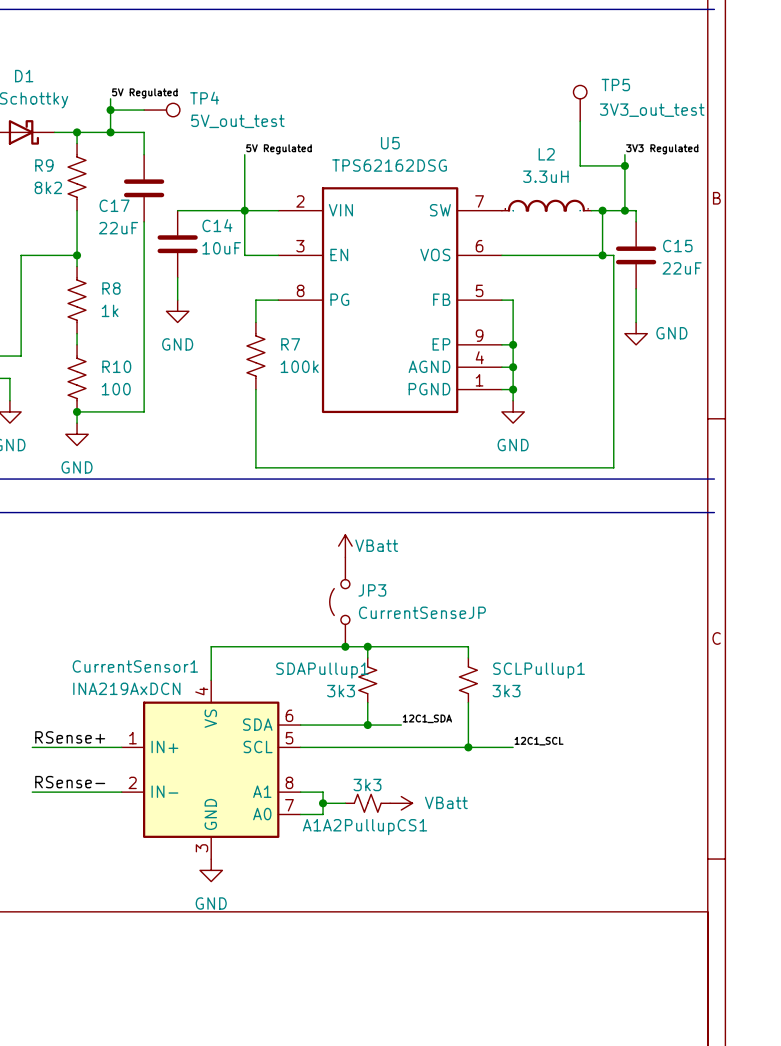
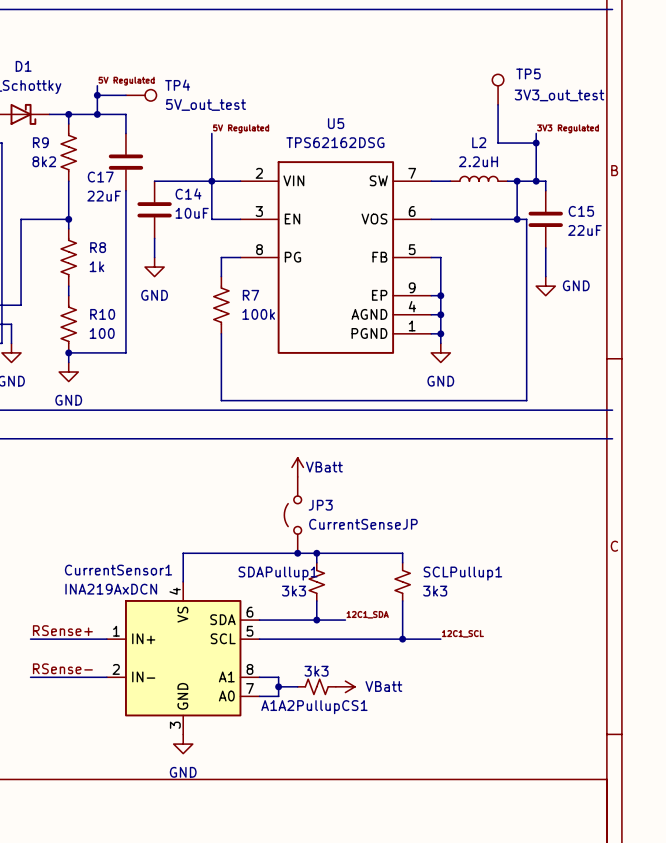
L2 value: 3.3uH (545, 176) -> 2.2uH (478, 161)
L2 symbol: [501, 199, 592, 212] -> [450, 176, 508, 182]
wire: none -> (431, 181) (450, 181)

